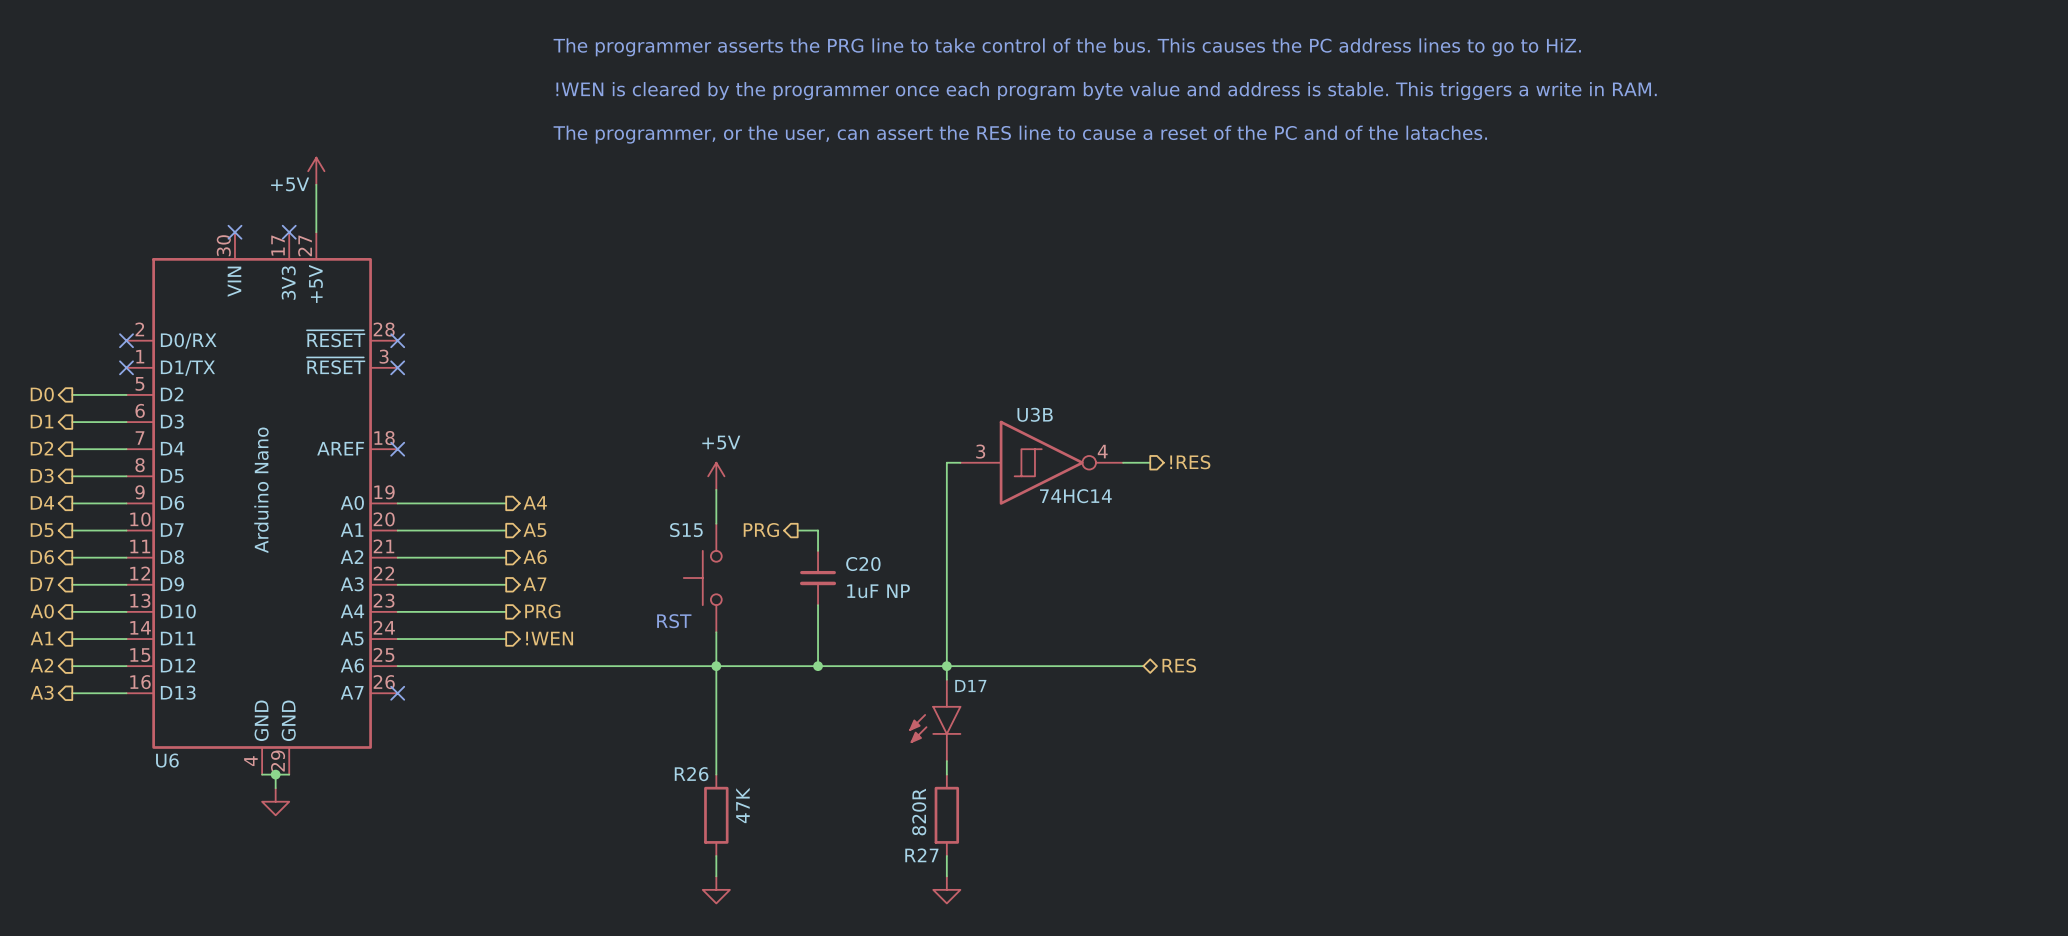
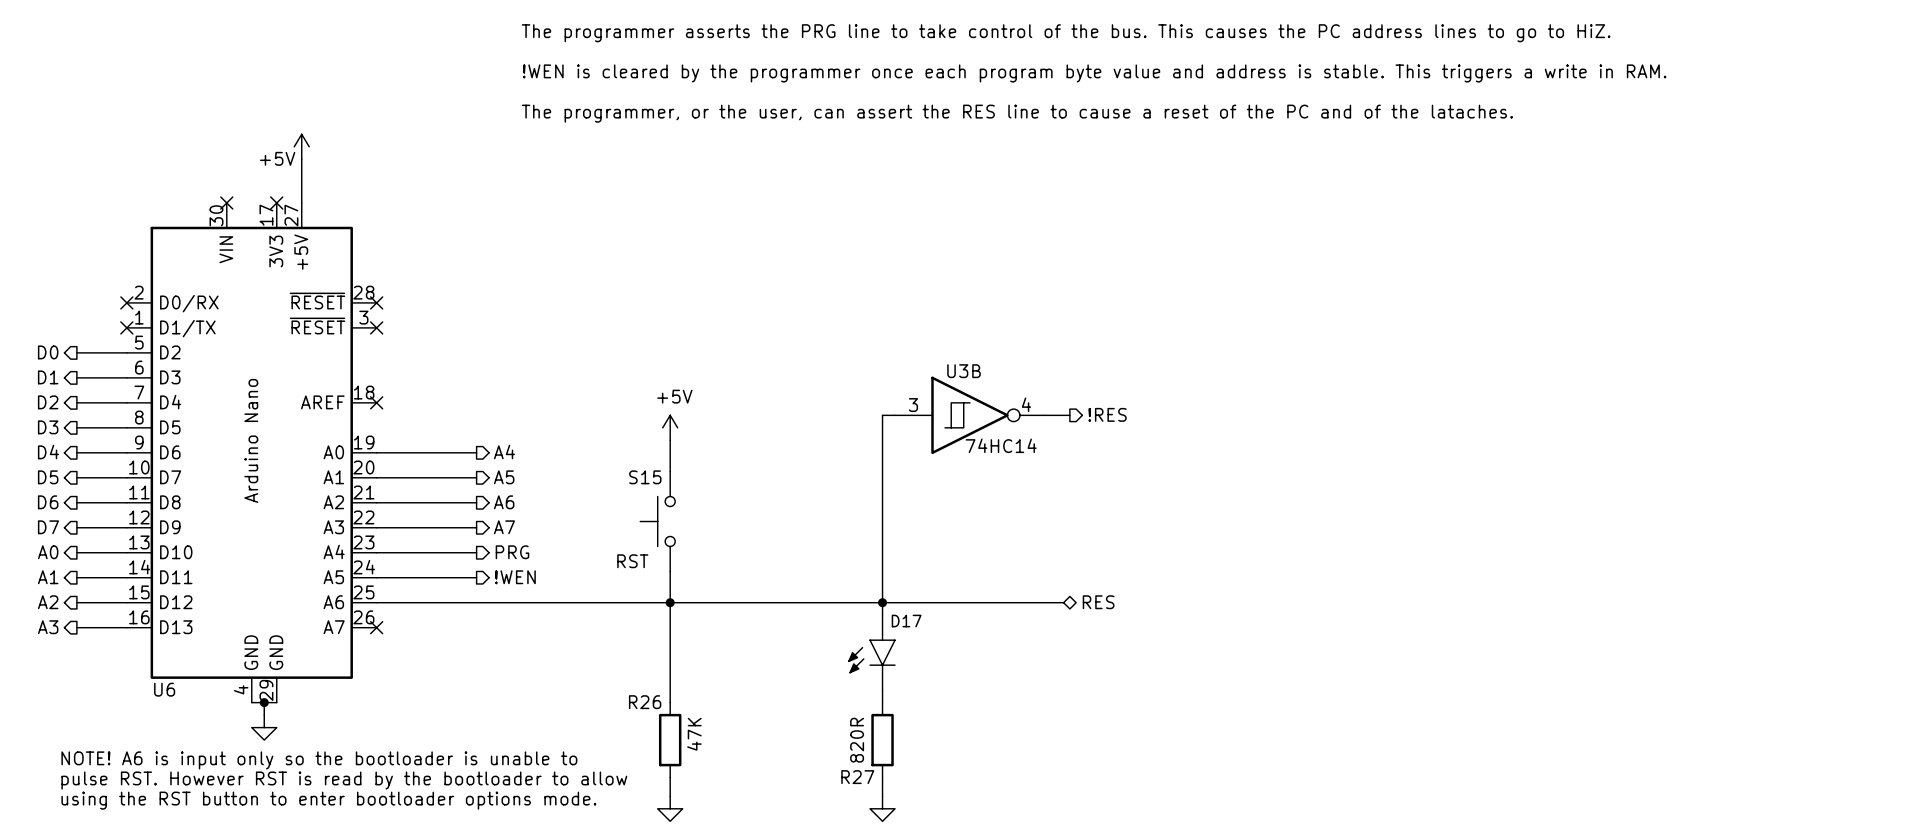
hierarchical label: PRG (761, 530) -> none
wire: (797, 530) (818, 530) (818, 550) -> none
C20: 1uF NP (818, 578) -> none
wire: (818, 605) (818, 666) -> none
junction: (818, 666) -> none
text: none -> NOTE! A6 is input only so the bootloader is unable to (319, 760)
text: none -> pulse RST. However RST is read by the bootloader to allow (344, 780)
text: none -> using the RST button to enter bootloader options mode. (328, 800)

